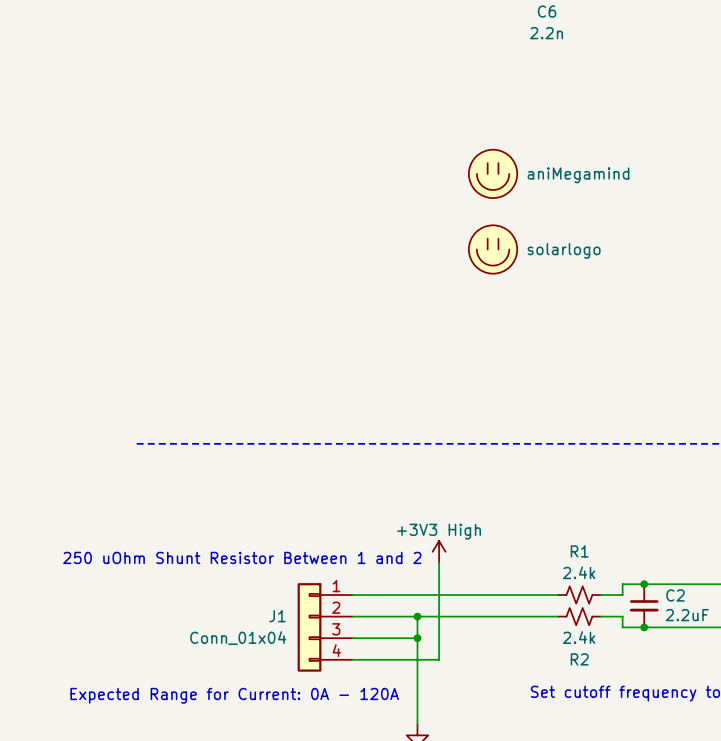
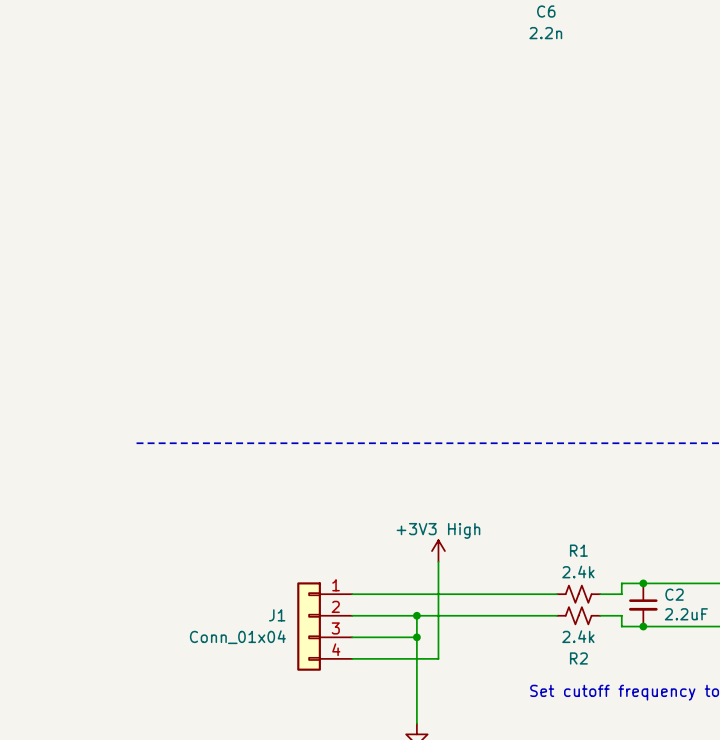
part: aniMegamind (493, 173) -> none
part: solarlogo (493, 249) -> none
text: 250 uOhm Shunt Resistor Between 1 and 2 (242, 557) -> none
text: Expected Range for Current: 0A - 120A (234, 695) -> none

